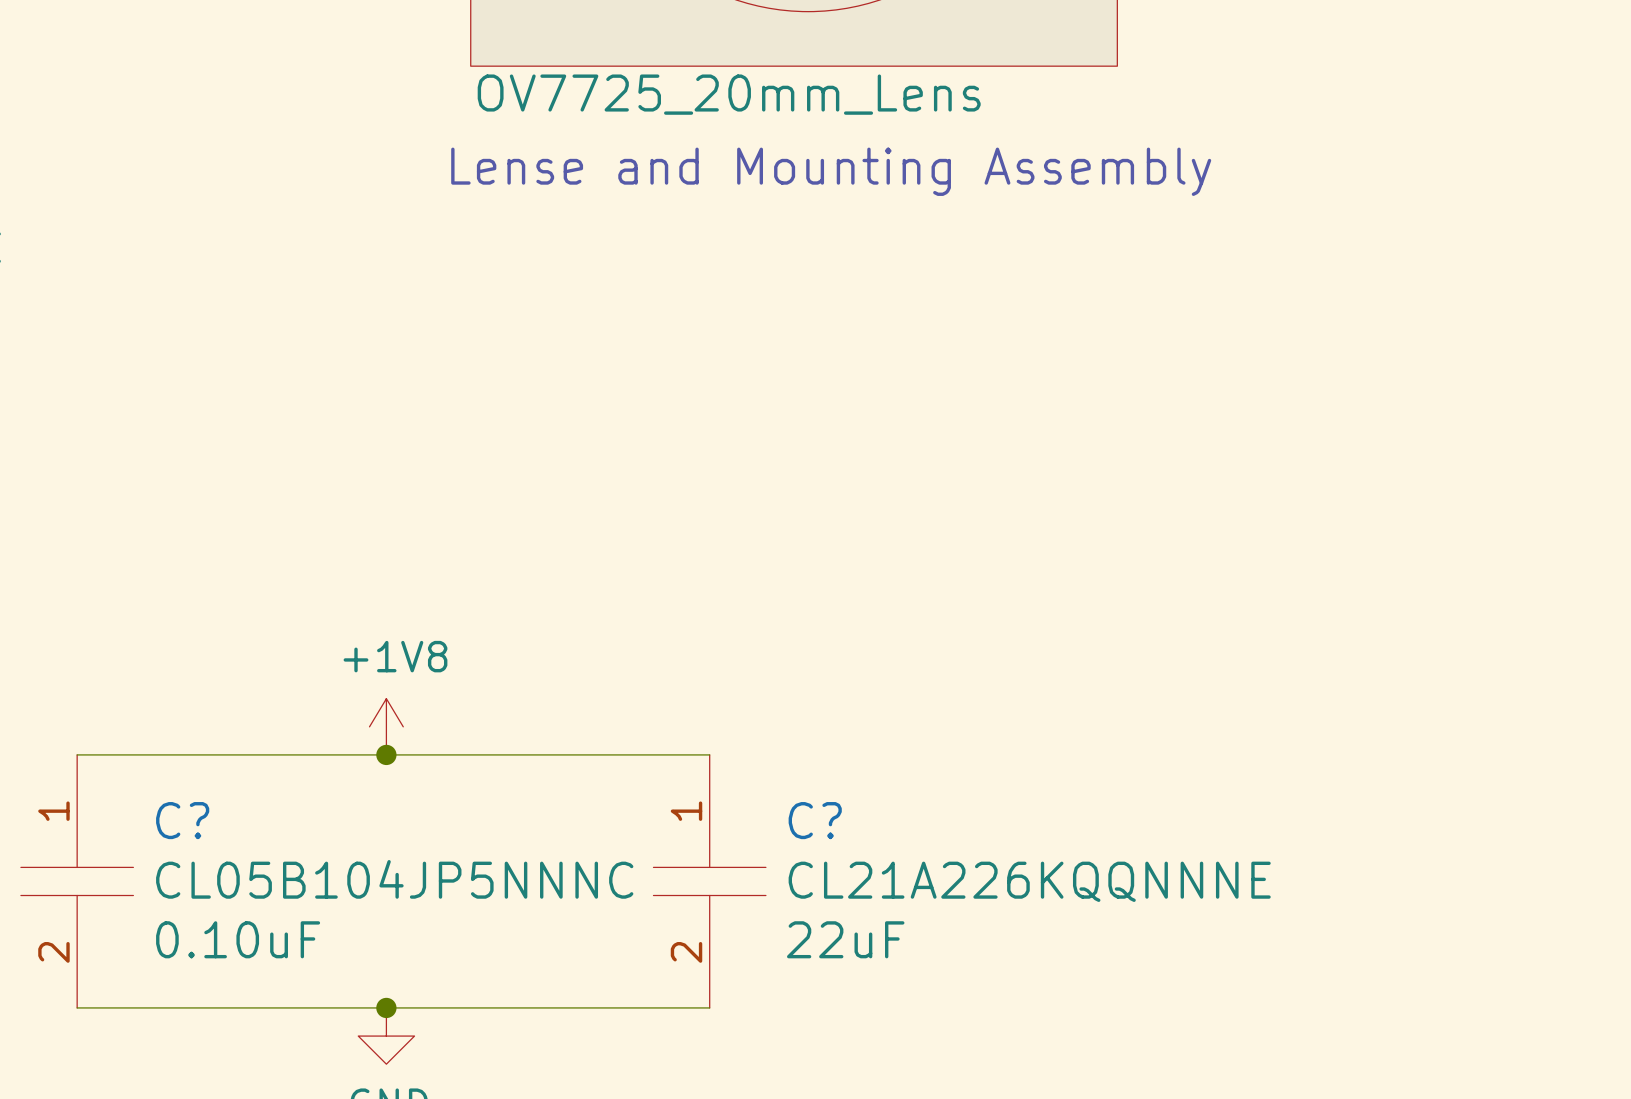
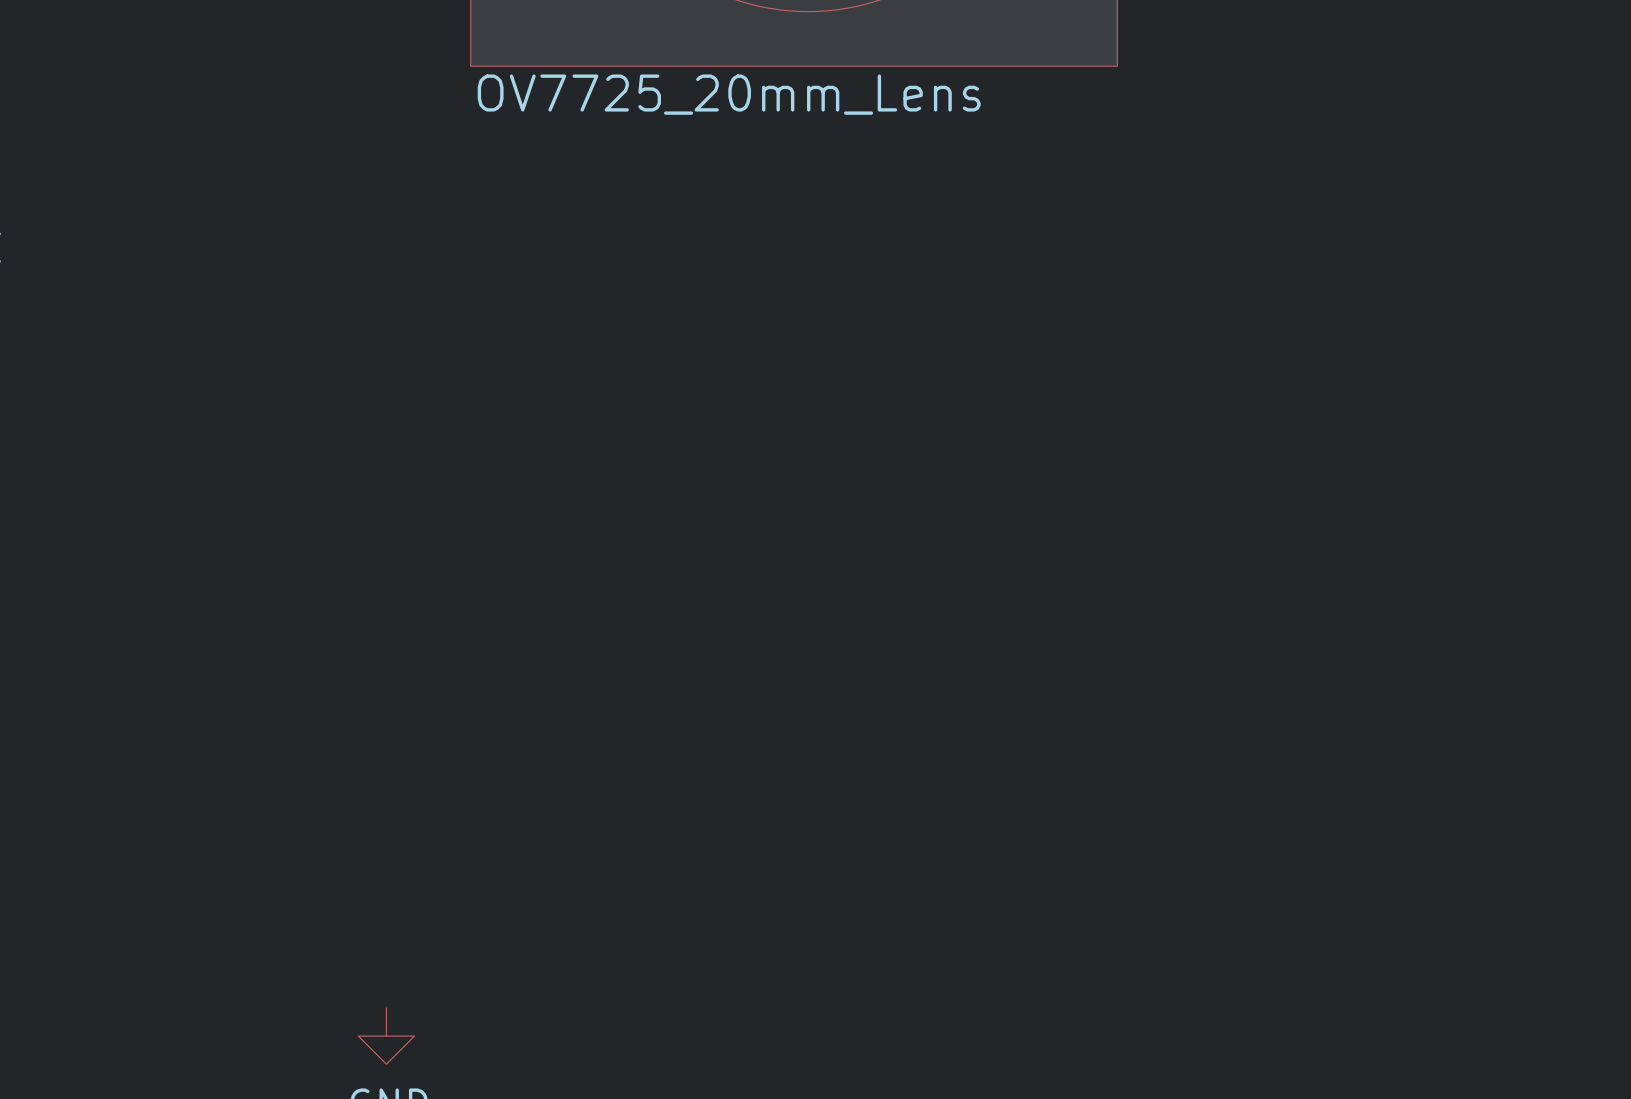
text: Lense and Mounting Assembly (831, 171) -> none
power symbol: +1V8 (386, 726) -> none
wire: (77, 754) (709, 754) -> none
junction: (386, 754) -> none
C?: CL05B104JP5NNNC (77, 881) -> none
C?: CL21A226KQQNNNE (709, 881) -> none
wire: (77, 1007) (709, 1007) -> none
junction: (386, 1007) -> none

